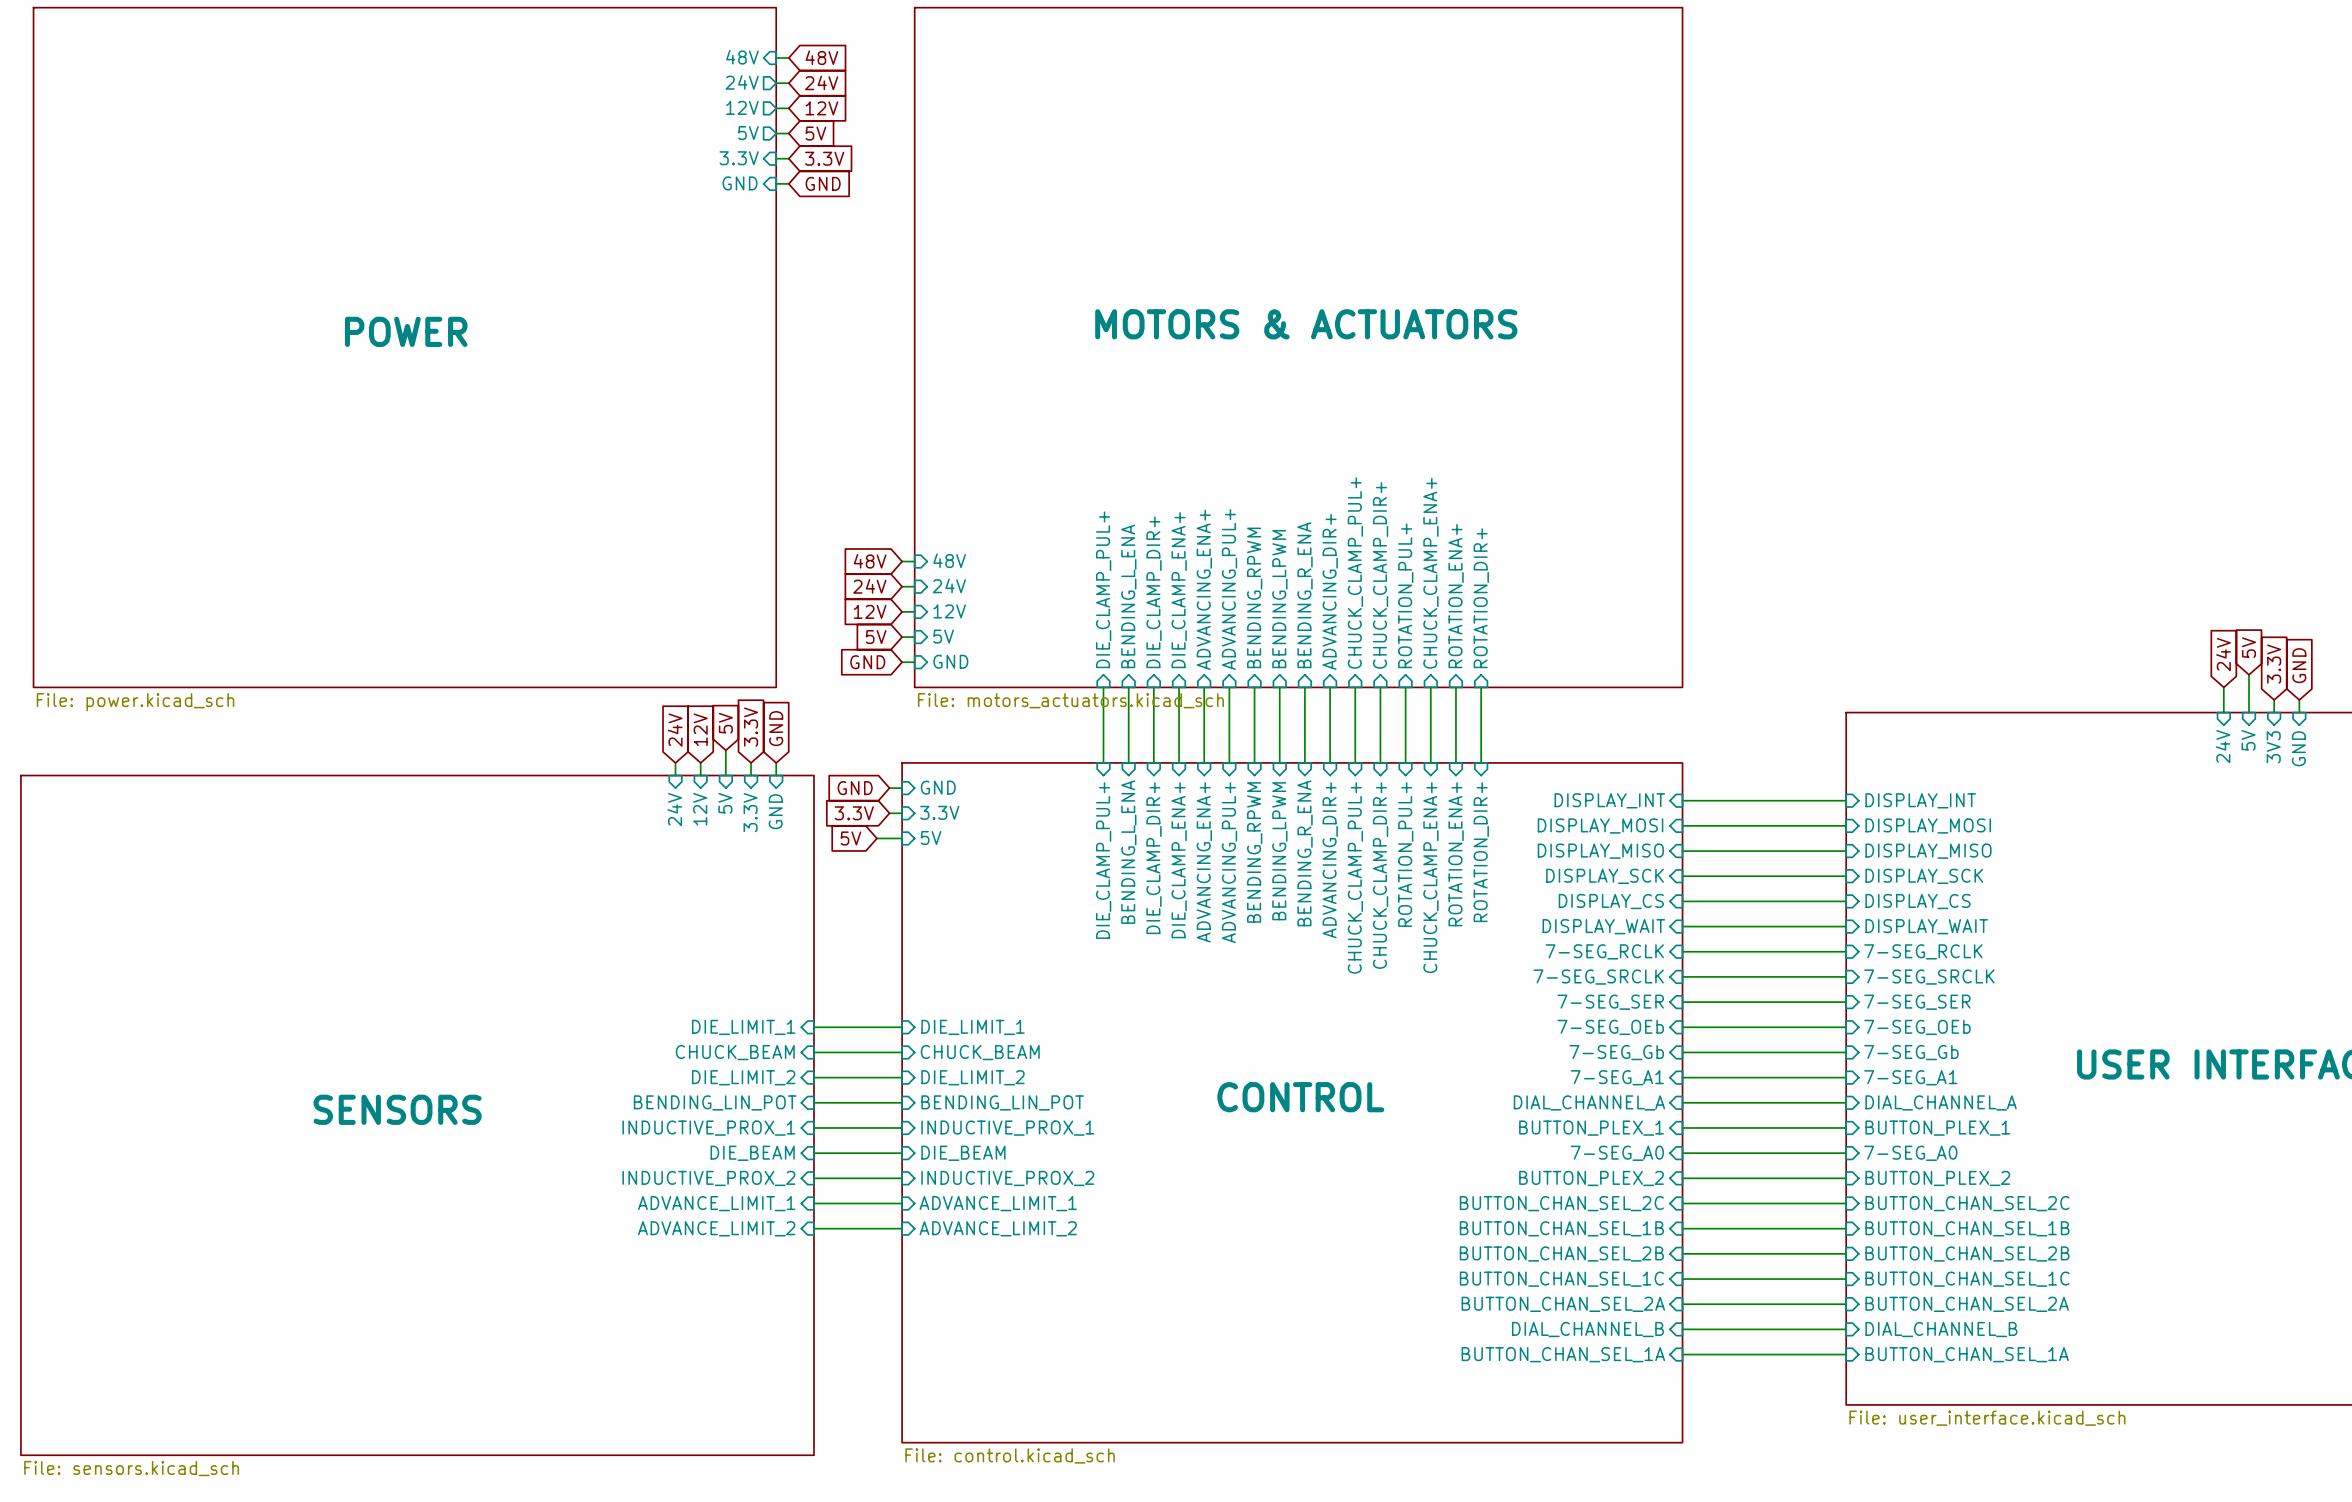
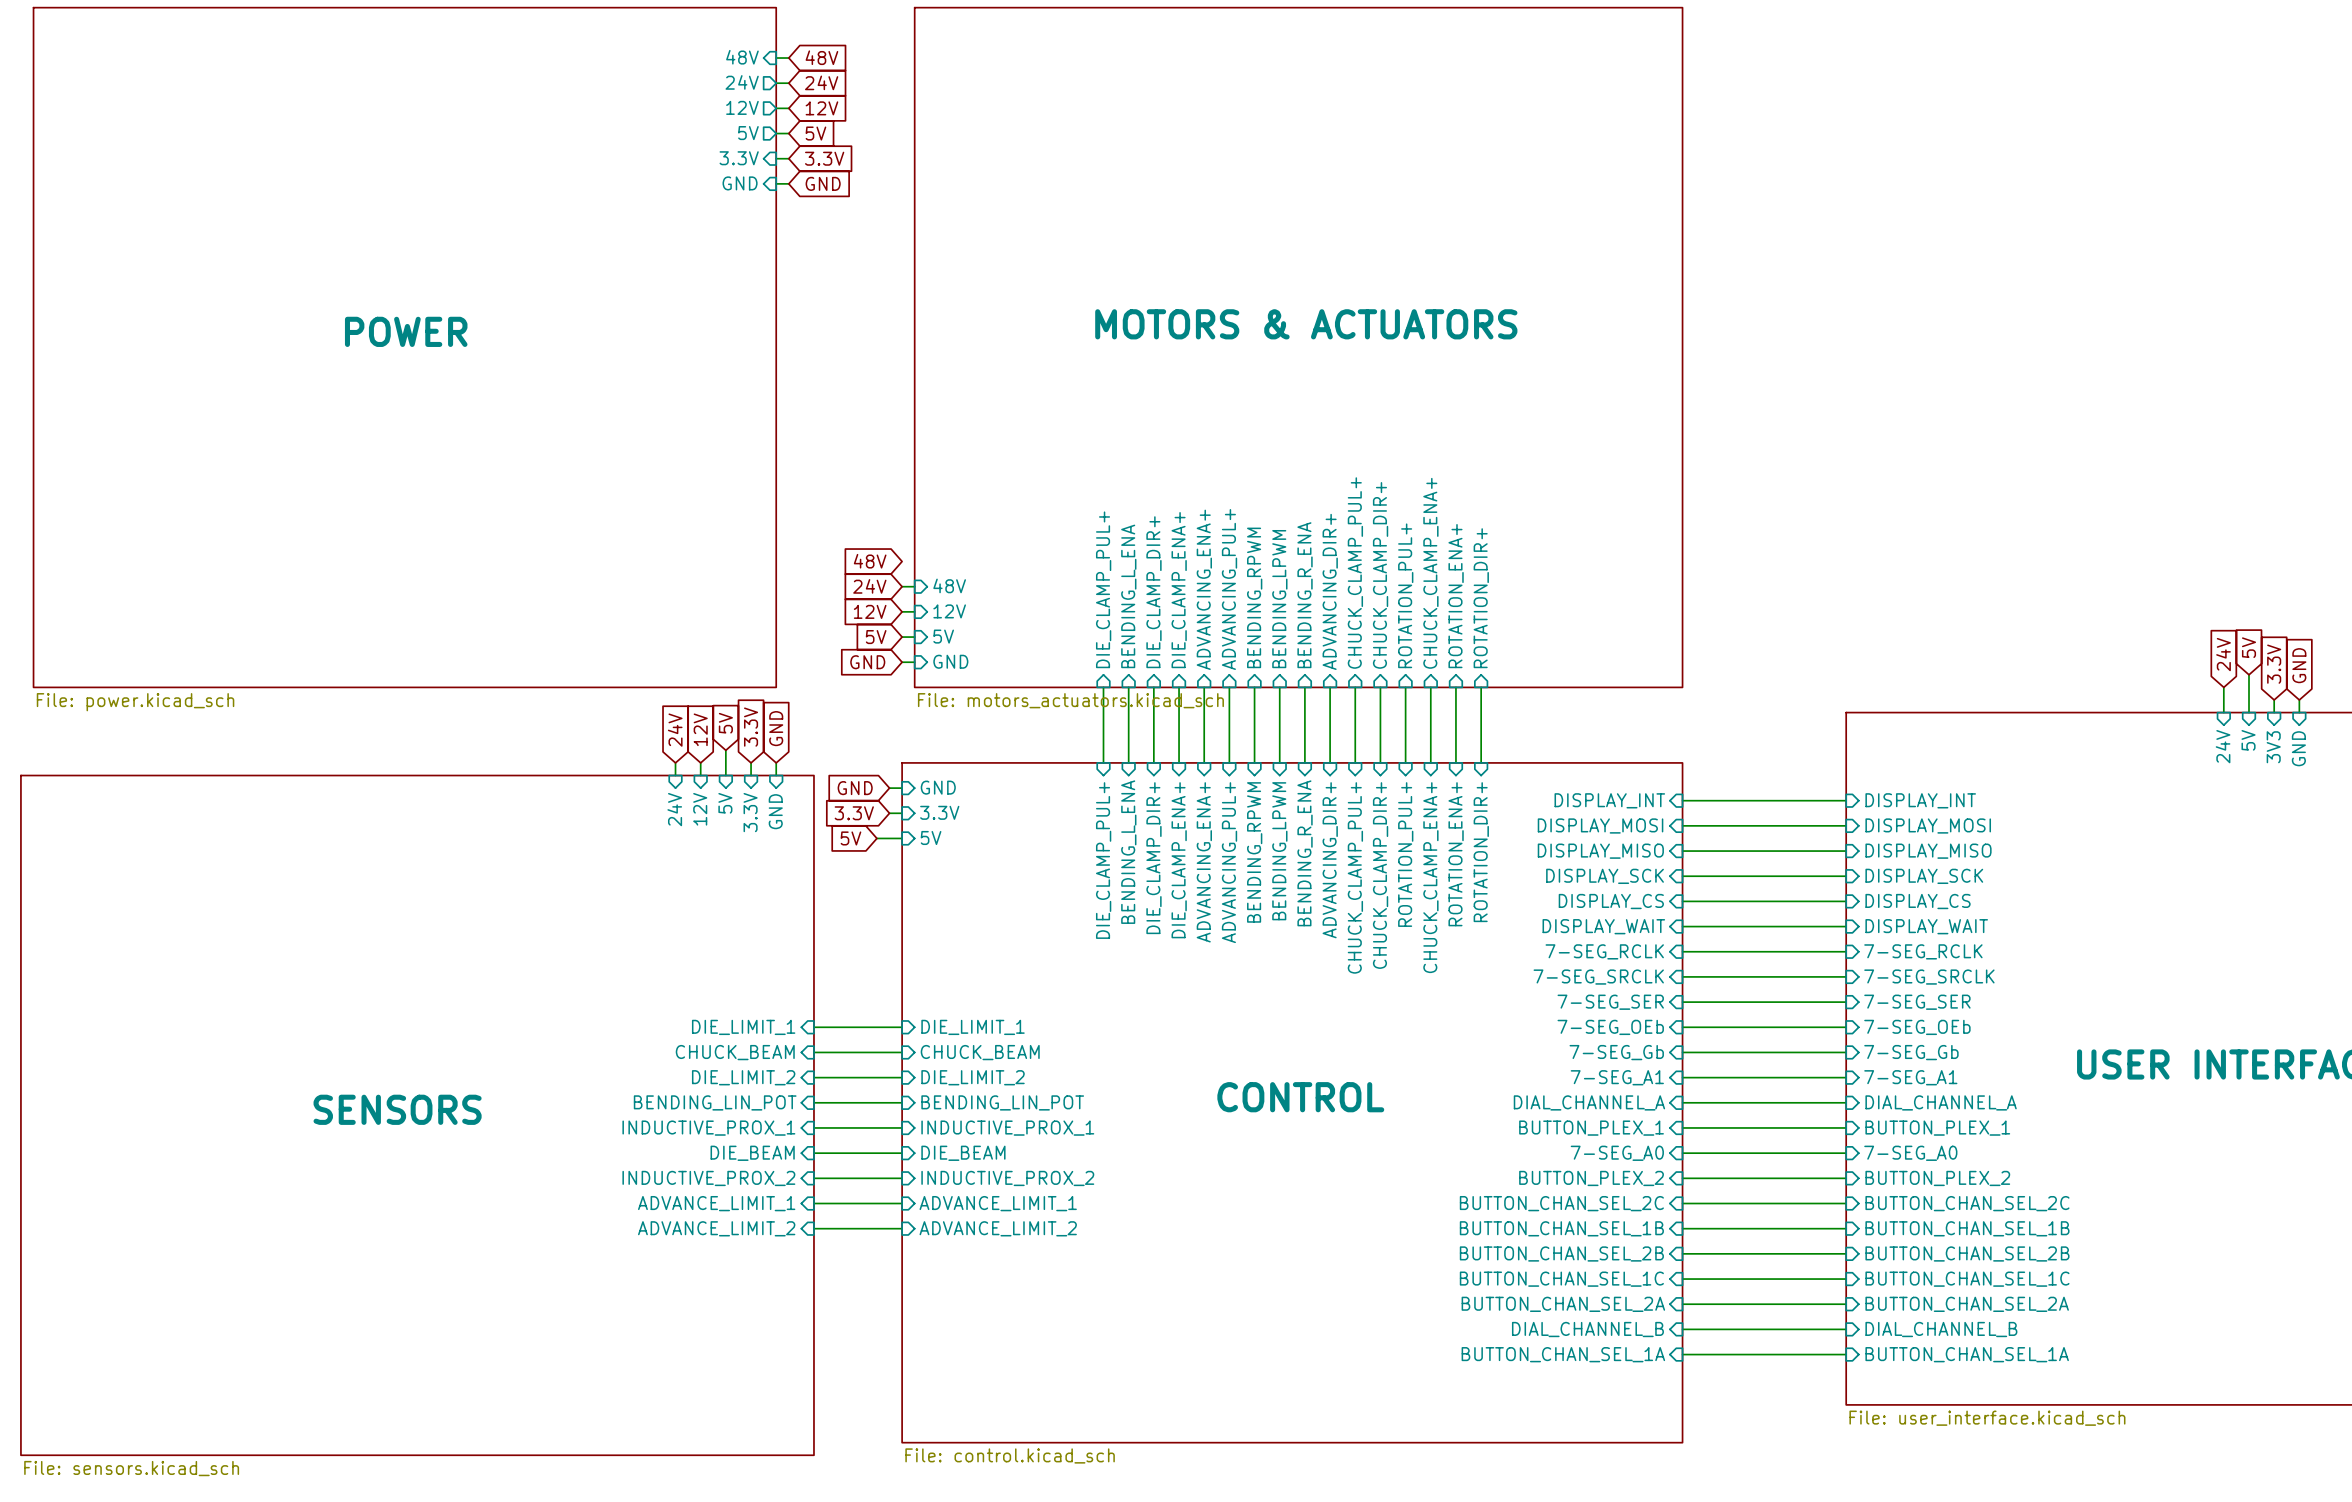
sheet pin: 48V (949, 560) -> none
wire: (902, 561) (914, 561) -> none
sheet pin: 24V (949, 585) -> 48V (949, 585)

